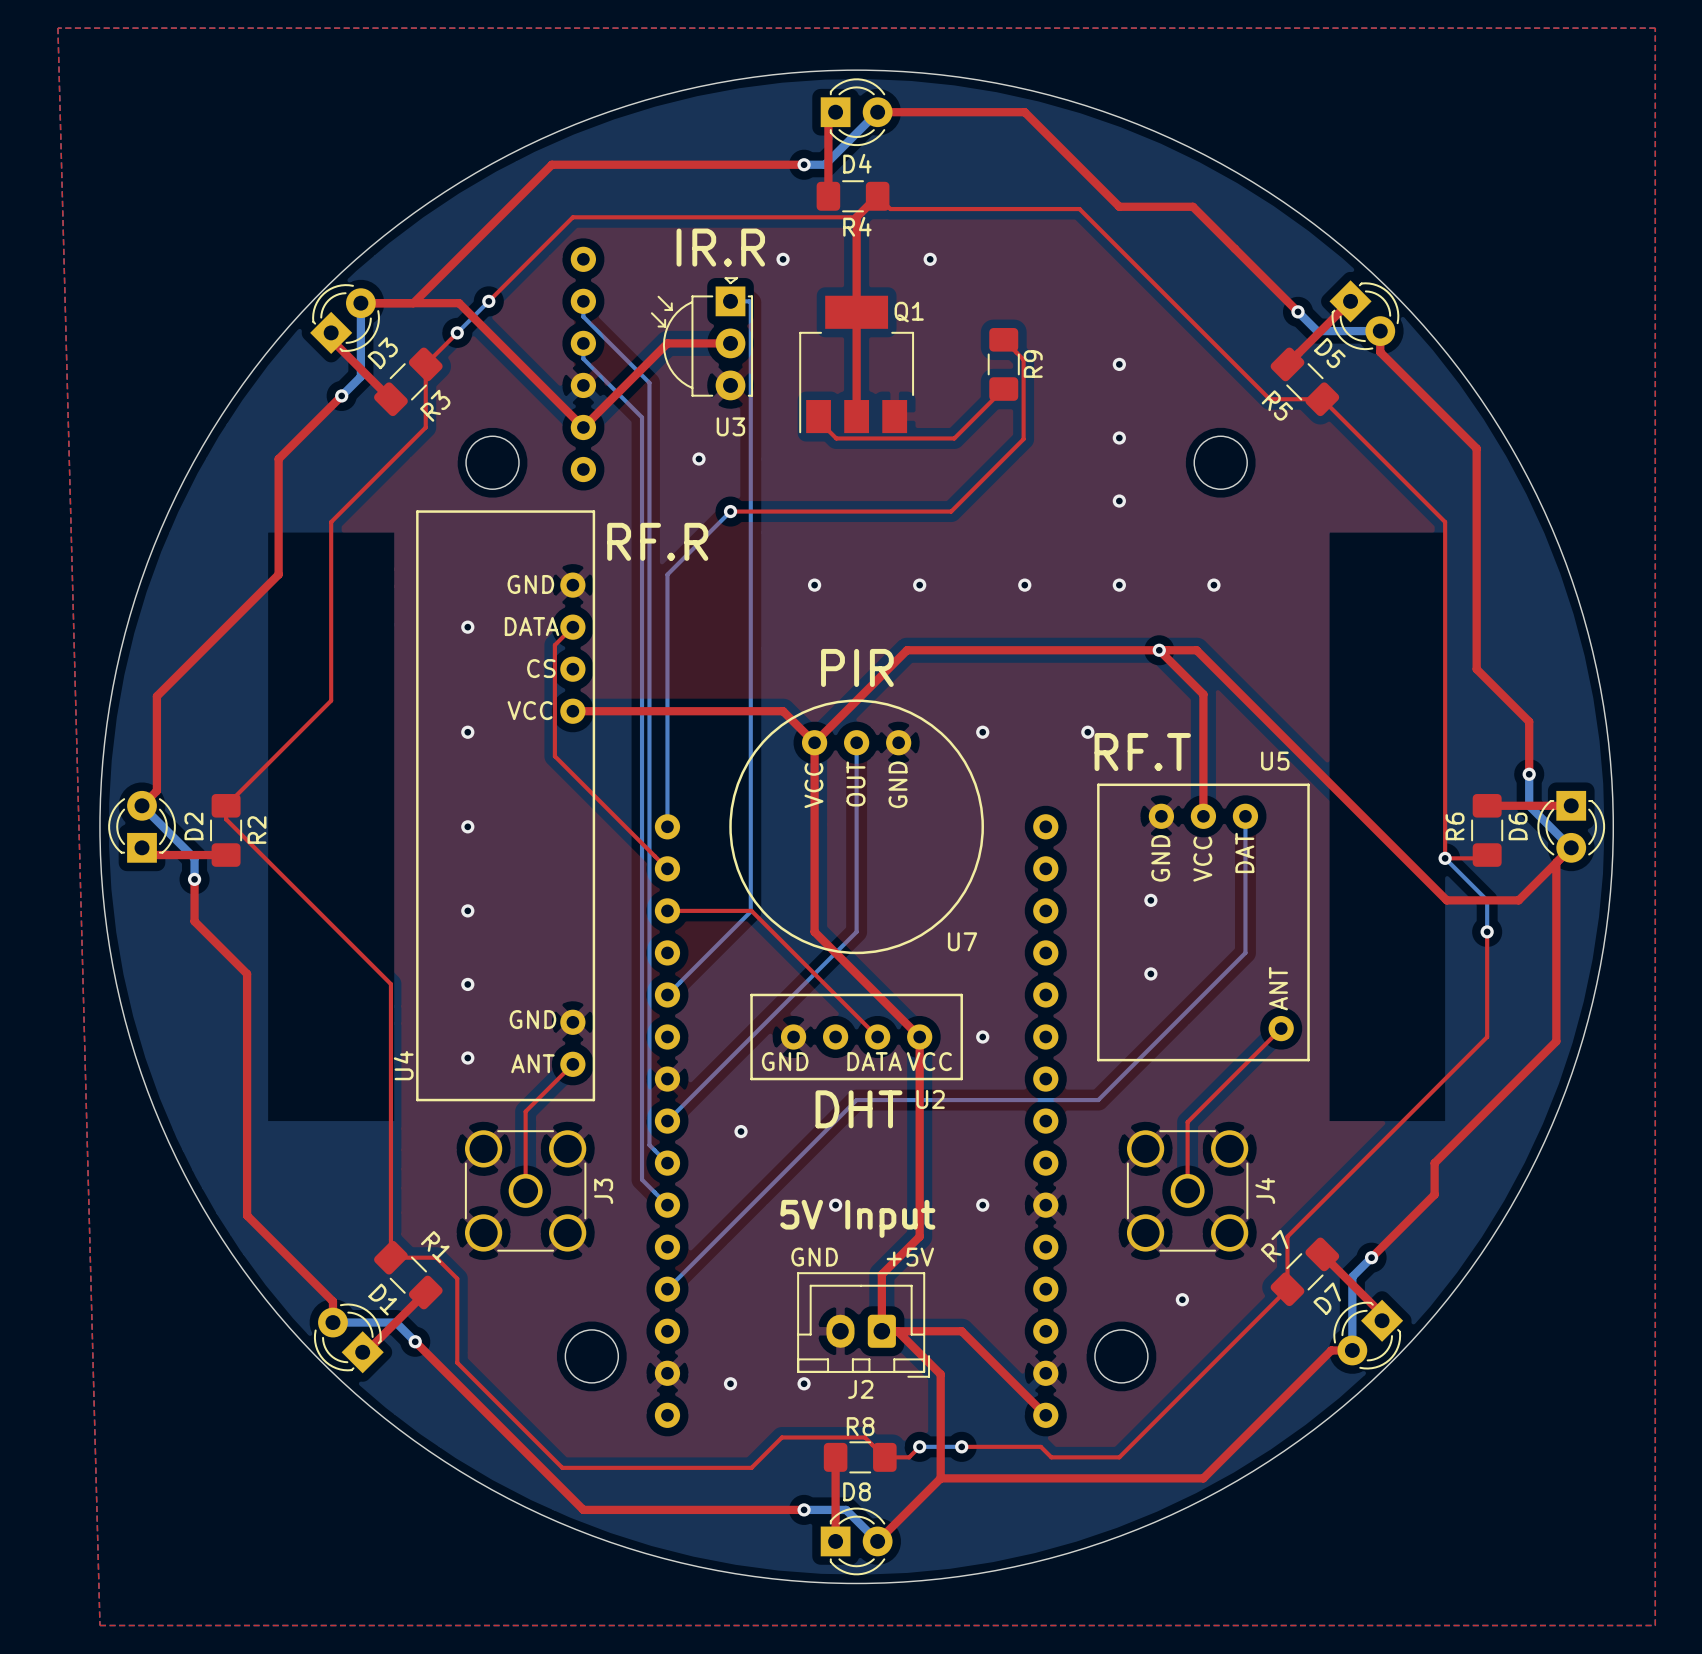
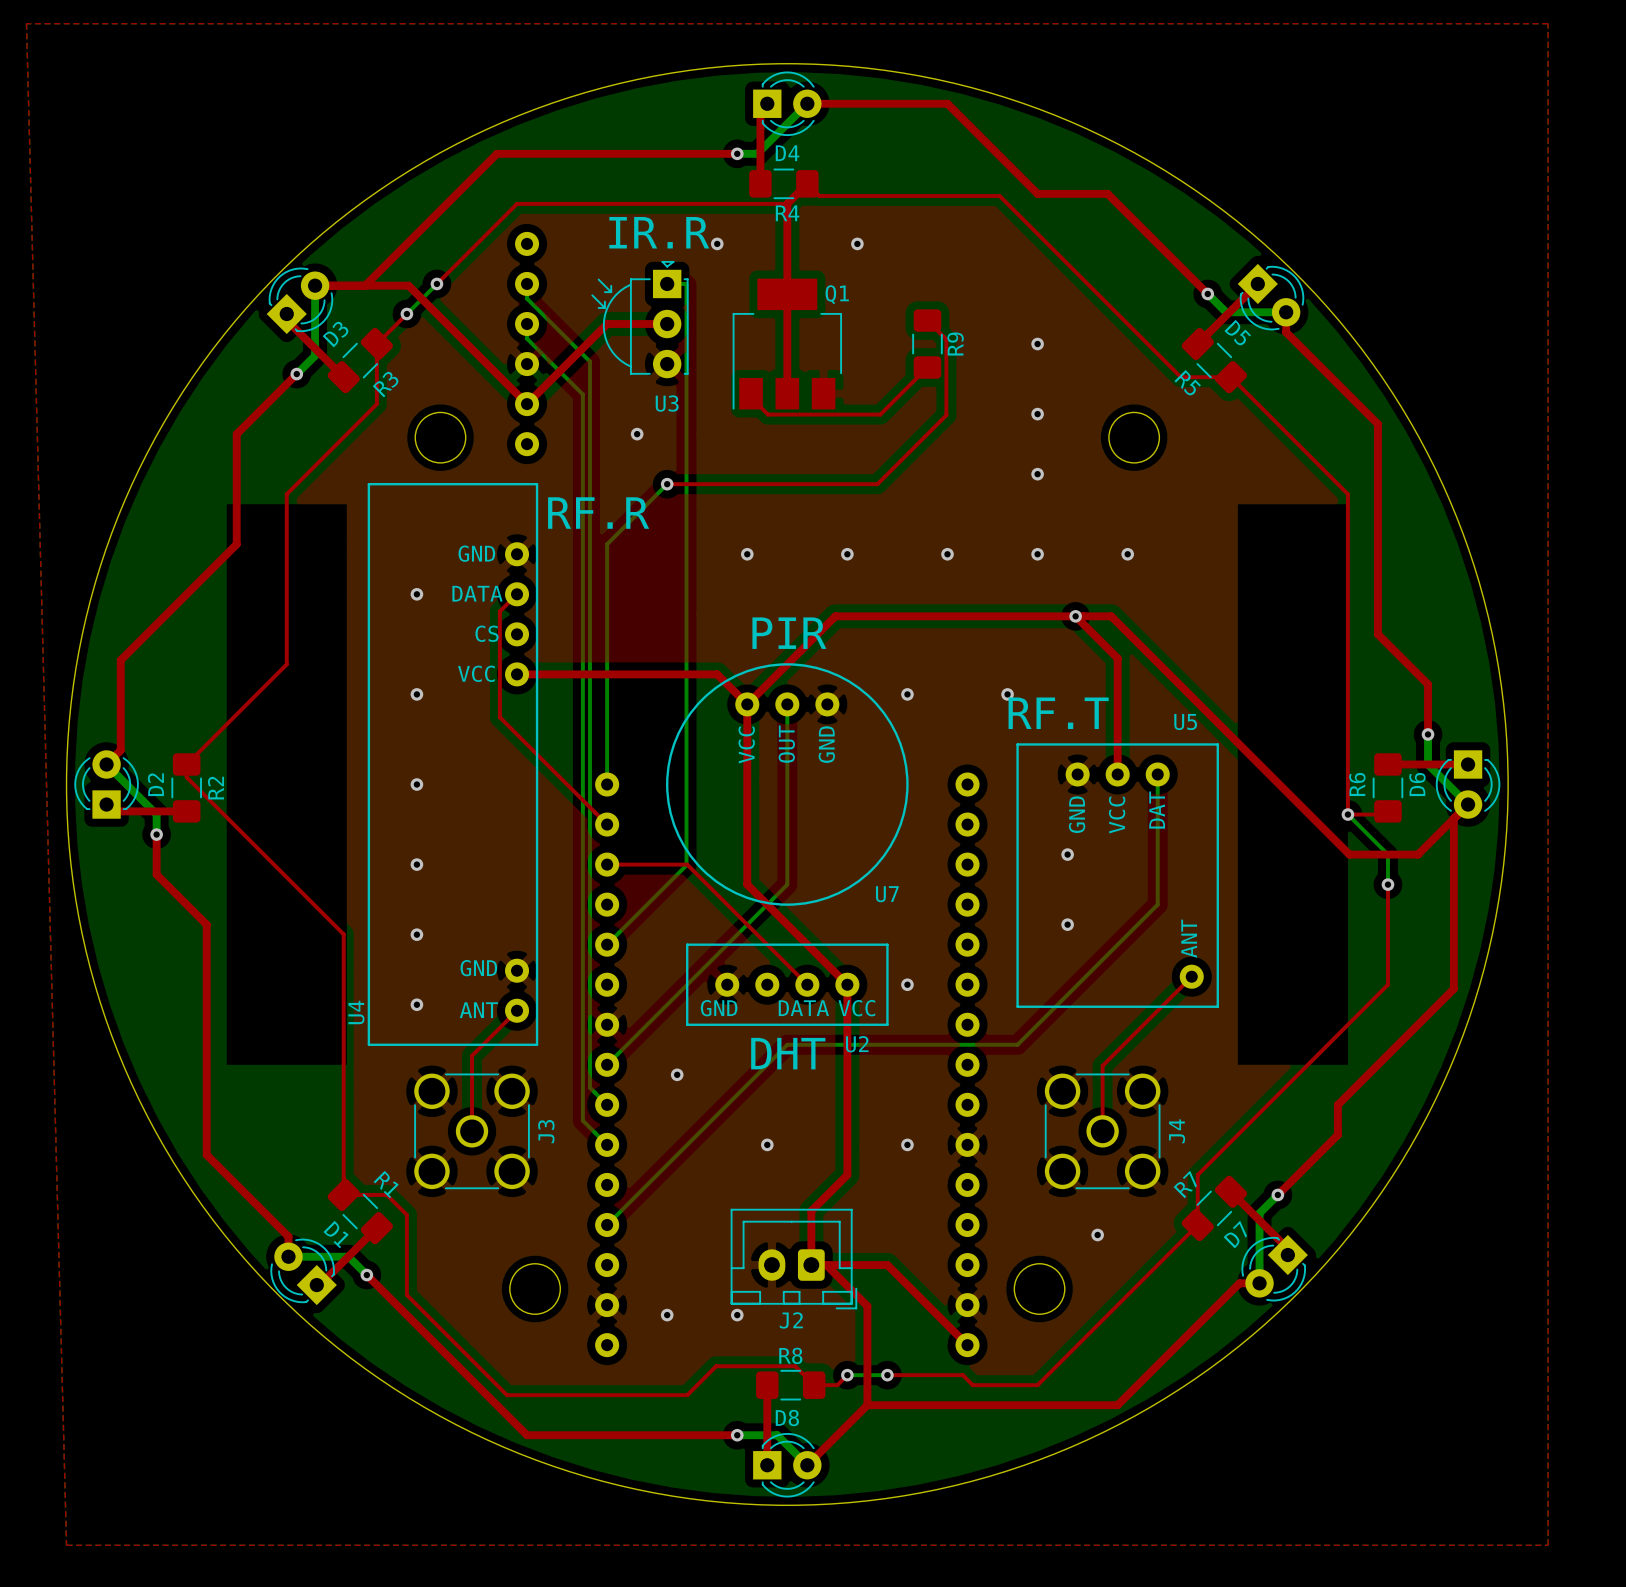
text: 5V Input (857, 1218) -> none
text: GND (814, 1257) -> none
text: +5V (910, 1257) -> none

